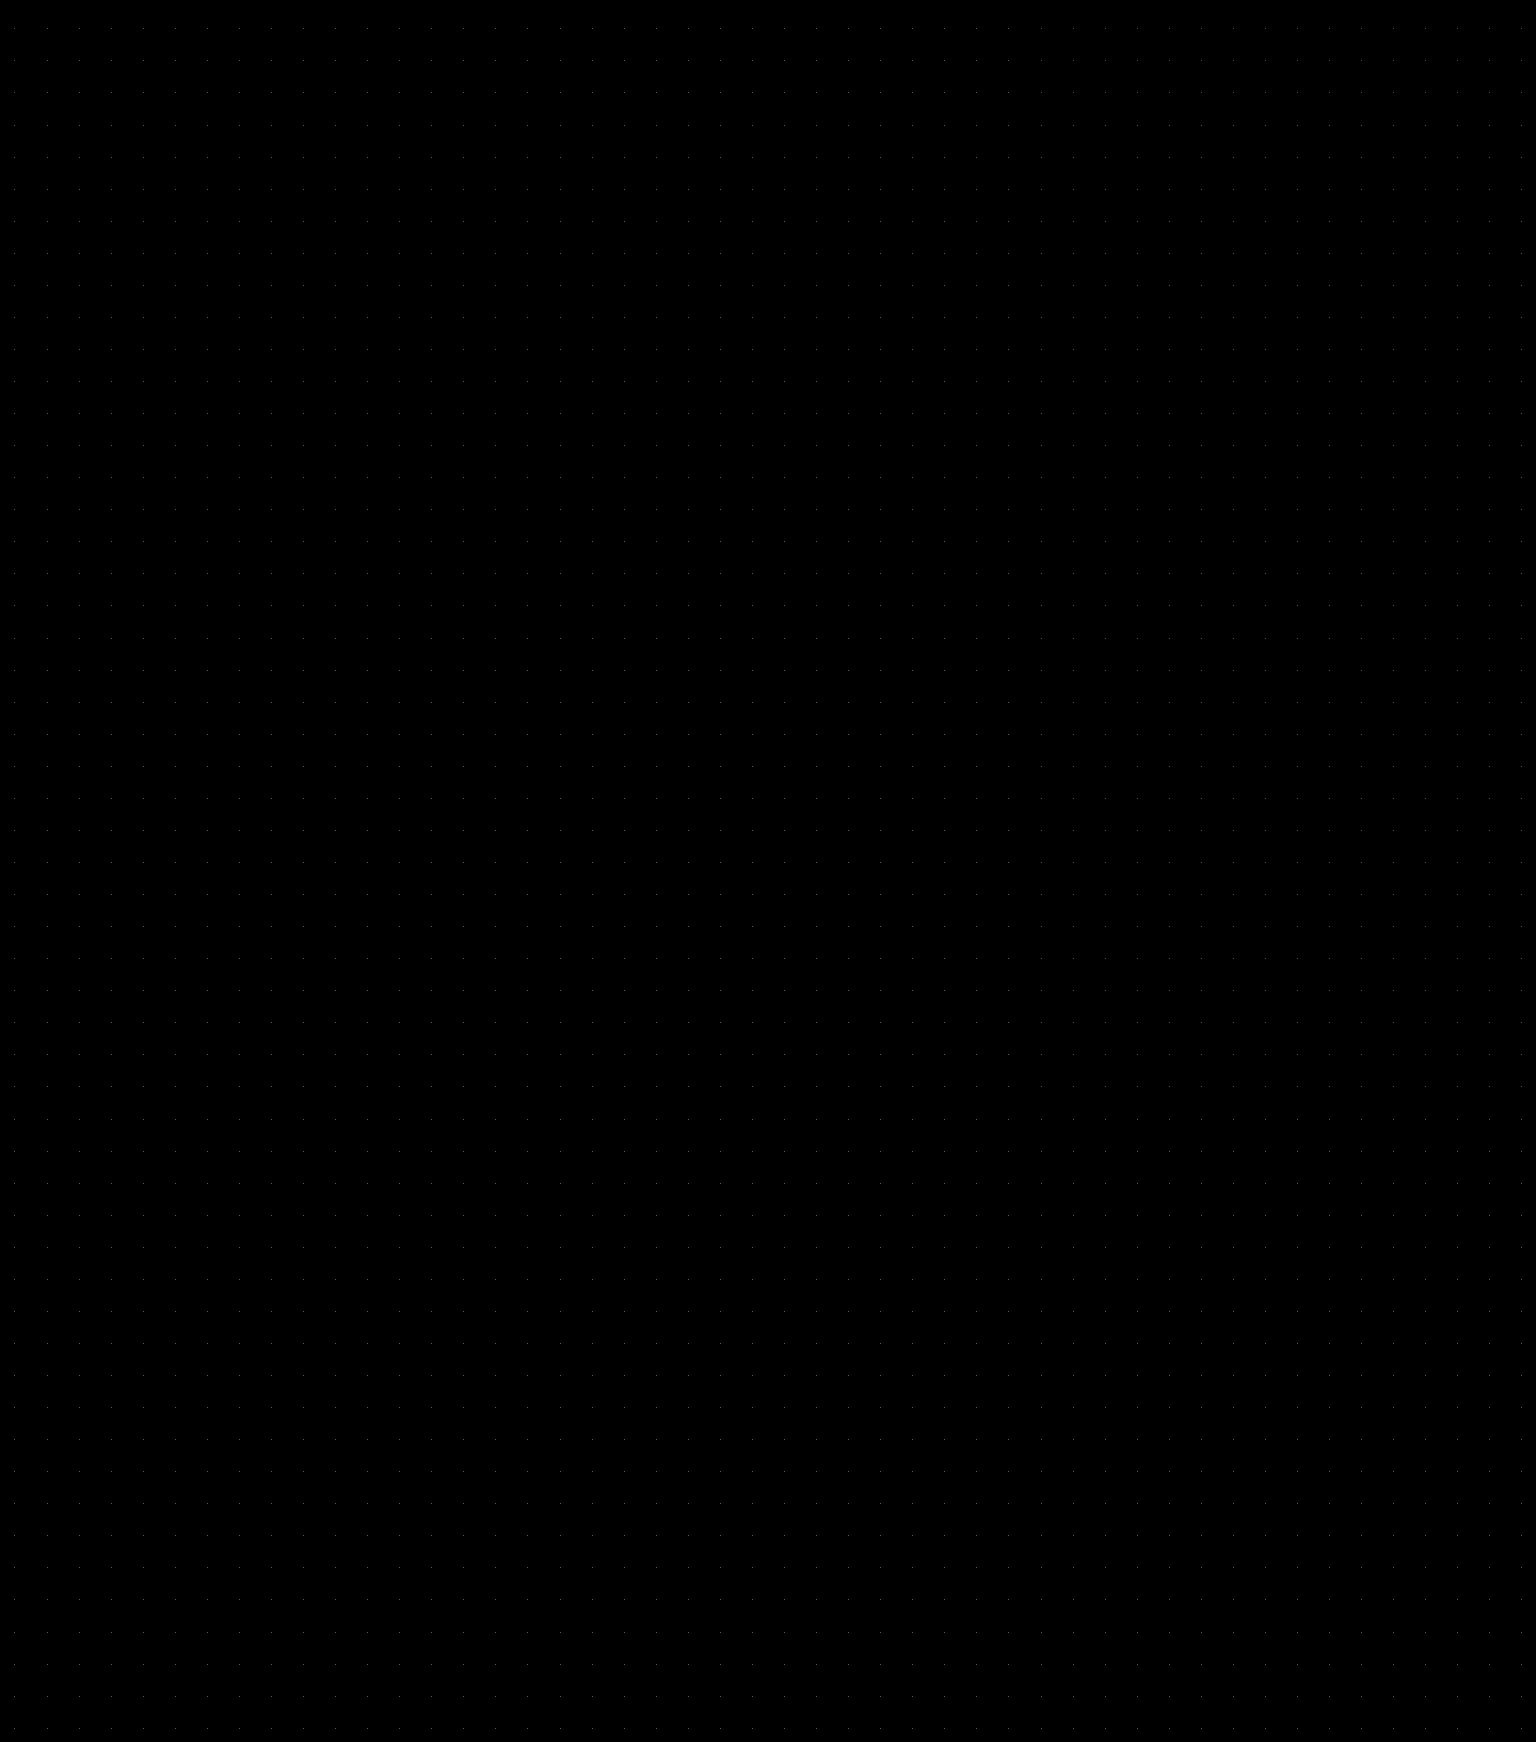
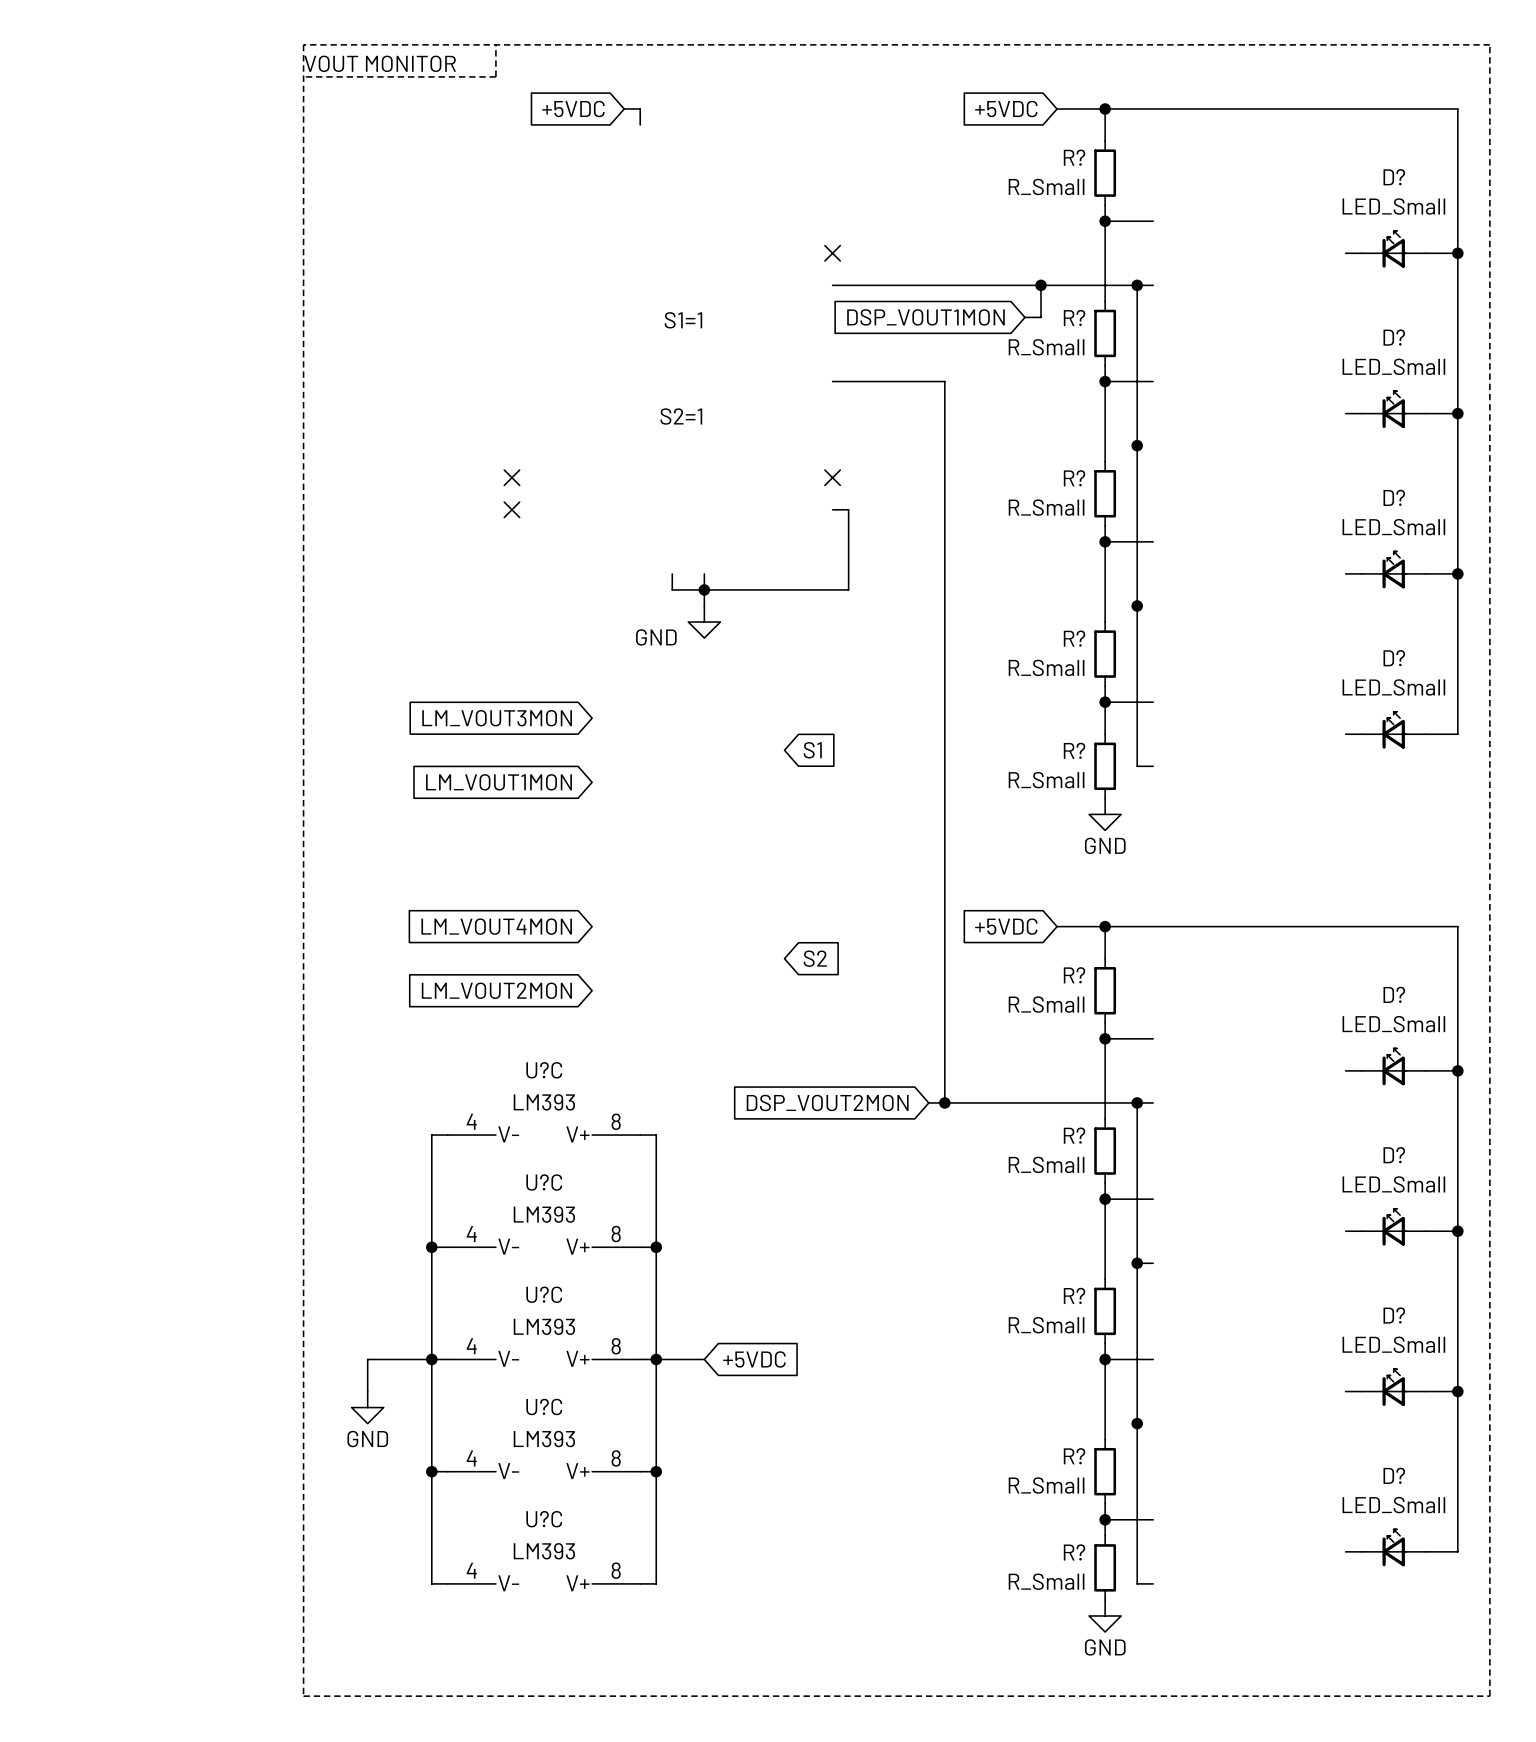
line: none -> (303, 44) (1489, 44) (1489, 1696) (303, 1696) (303, 44)
line: none -> (495, 44) (495, 76) (303, 76)
text: none -> VOUT MONITOR (380, 63)
global label: none -> +5VDC (573, 109)
wire: none -> (624, 109) (640, 109) (640, 125)
global label: none -> +5VDC (1006, 109)
wire: none -> (1057, 109) (1457, 109) (1457, 734) (1425, 734)
wire: none -> (1105, 109) (1105, 141)
junction: none -> (1105, 109)
R?: none -> R_Small (1105, 173)
wire: none -> (1105, 205) (1105, 301)
wire: none -> (1105, 221) (1153, 221)
junction: none -> (1105, 221)
D?: none -> LED_Small (1393, 249)
no-connect mark: none -> (832, 253)
wire: none -> (1345, 253) (1361, 253)
wire: none -> (1425, 253) (1457, 253)
junction: none -> (1457, 253)
wire: none -> (832, 285) (1153, 285)
wire: none -> (1041, 285) (1041, 317) (1024, 317)
junction: none -> (1041, 285)
wire: none -> (1137, 285) (1137, 766) (1153, 766)
junction: none -> (1137, 285)
global label: none -> DSP_VOUT1MON (925, 317)
text: none -> S1=1 (683, 320)
R?: none -> R_Small (1105, 333)
wire: none -> (1105, 365) (1105, 461)
wire: none -> (832, 381) (944, 381) (944, 1102)
wire: none -> (1105, 381) (1153, 381)
junction: none -> (1105, 381)
D?: none -> LED_Small (1393, 409)
wire: none -> (1345, 413) (1361, 413)
wire: none -> (1425, 413) (1457, 413)
junction: none -> (1457, 413)
text: none -> S2=1 (681, 416)
junction: none -> (1137, 445)
no-connect mark: none -> (511, 477)
no-connect mark: none -> (832, 477)
R?: none -> R_Small (1105, 493)
no-connect mark: none -> (511, 509)
wire: none -> (832, 509) (848, 509) (848, 589) (672, 589) (672, 573)
wire: none -> (1105, 525) (1105, 622)
wire: none -> (1105, 541) (1153, 541)
junction: none -> (1105, 541)
D?: none -> LED_Small (1393, 569)
wire: none -> (704, 573) (704, 605)
wire: none -> (1345, 573) (1361, 573)
wire: none -> (1425, 573) (1457, 573)
junction: none -> (1457, 573)
junction: none -> (704, 589)
junction: none -> (1137, 605)
power symbol: none -> GND (704, 622)
R?: none -> R_Small (1105, 654)
wire: none -> (1105, 686) (1105, 734)
wire: none -> (1105, 702) (1153, 702)
junction: none -> (1105, 702)
global label: none -> LM_VOUT3MON (497, 718)
D?: none -> LED_Small (1393, 730)
wire: none -> (1345, 734) (1361, 734)
global label: none -> S1 (812, 750)
R?: none -> R_Small (1105, 766)
global label: none -> LM_VOUT1MON (498, 782)
power symbol: none -> GND (1105, 814)
global label: none -> +5VDC (1006, 926)
wire: none -> (1057, 926) (1457, 926) (1457, 1551) (1425, 1551)
wire: none -> (1105, 926) (1105, 958)
junction: none -> (1105, 926)
global label: none -> LM_VOUT4MON (496, 926)
global label: none -> S2 (815, 958)
R?: none -> R_Small (1105, 990)
global label: none -> LM_VOUT2MON (496, 990)
wire: none -> (1105, 1022) (1105, 1119)
wire: none -> (1105, 1038) (1153, 1038)
junction: none -> (1105, 1038)
D?: none -> LED_Small (1393, 1066)
wire: none -> (1345, 1070) (1361, 1070)
wire: none -> (1425, 1070) (1457, 1070)
junction: none -> (1457, 1070)
wire: none -> (928, 1102) (1153, 1102)
junction: none -> (944, 1102)
wire: none -> (1137, 1102) (1137, 1583) (1153, 1583)
junction: none -> (1137, 1102)
global label: none -> DSP_VOUT2MON (827, 1102)
wire: none -> (447, 1135) (431, 1135) (431, 1583) (447, 1583)
U?C: none -> LM393 (544, 1135)
wire: none -> (640, 1135) (656, 1135) (656, 1583) (640, 1583)
R?: none -> R_Small (1105, 1151)
wire: none -> (1105, 1183) (1105, 1279)
wire: none -> (1105, 1199) (1153, 1199)
junction: none -> (1105, 1199)
D?: none -> LED_Small (1393, 1227)
wire: none -> (1345, 1231) (1361, 1231)
wire: none -> (1425, 1231) (1457, 1231)
junction: none -> (1457, 1231)
wire: none -> (431, 1247) (447, 1247)
junction: none -> (431, 1247)
U?C: none -> LM393 (544, 1247)
wire: none -> (640, 1247) (656, 1247)
junction: none -> (656, 1247)
wire: none -> (1137, 1263) (1153, 1263)
junction: none -> (1137, 1263)
R?: none -> R_Small (1105, 1311)
wire: none -> (1105, 1343) (1105, 1439)
junction: none -> (431, 1359)
wire: none -> (447, 1359) (367, 1359) (367, 1391)
U?C: none -> LM393 (544, 1359)
wire: none -> (640, 1359) (704, 1359)
junction: none -> (656, 1359)
global label: none -> +5VDC (754, 1359)
wire: none -> (1105, 1359) (1153, 1359)
junction: none -> (1105, 1359)
D?: none -> LED_Small (1393, 1387)
wire: none -> (1345, 1391) (1361, 1391)
wire: none -> (1425, 1391) (1457, 1391)
junction: none -> (1457, 1391)
power symbol: none -> GND (367, 1407)
junction: none -> (1137, 1423)
wire: none -> (431, 1471) (447, 1471)
junction: none -> (431, 1471)
U?C: none -> LM393 (544, 1471)
wire: none -> (640, 1471) (656, 1471)
junction: none -> (656, 1471)
R?: none -> R_Small (1105, 1471)
wire: none -> (1105, 1503) (1105, 1535)
wire: none -> (1105, 1519) (1153, 1519)
junction: none -> (1105, 1519)
D?: none -> LED_Small (1393, 1547)
wire: none -> (1345, 1551) (1361, 1551)
R?: none -> R_Small (1105, 1567)
U?C: none -> LM393 (544, 1583)
power symbol: none -> GND (1105, 1615)

